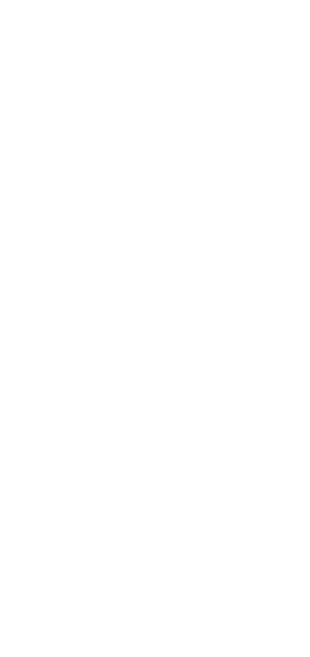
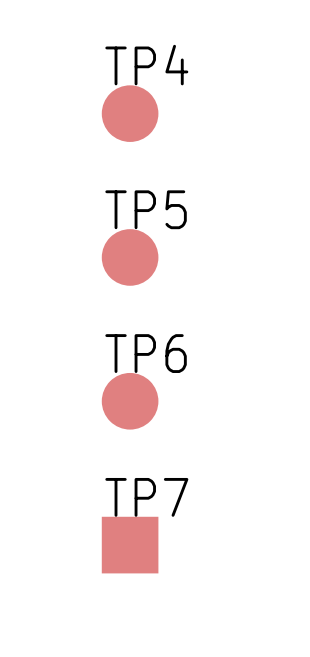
TP4: none -> (130, 113)
TP5: none -> (130, 257)
TP6: none -> (130, 401)
TP7: none -> (130, 545)

